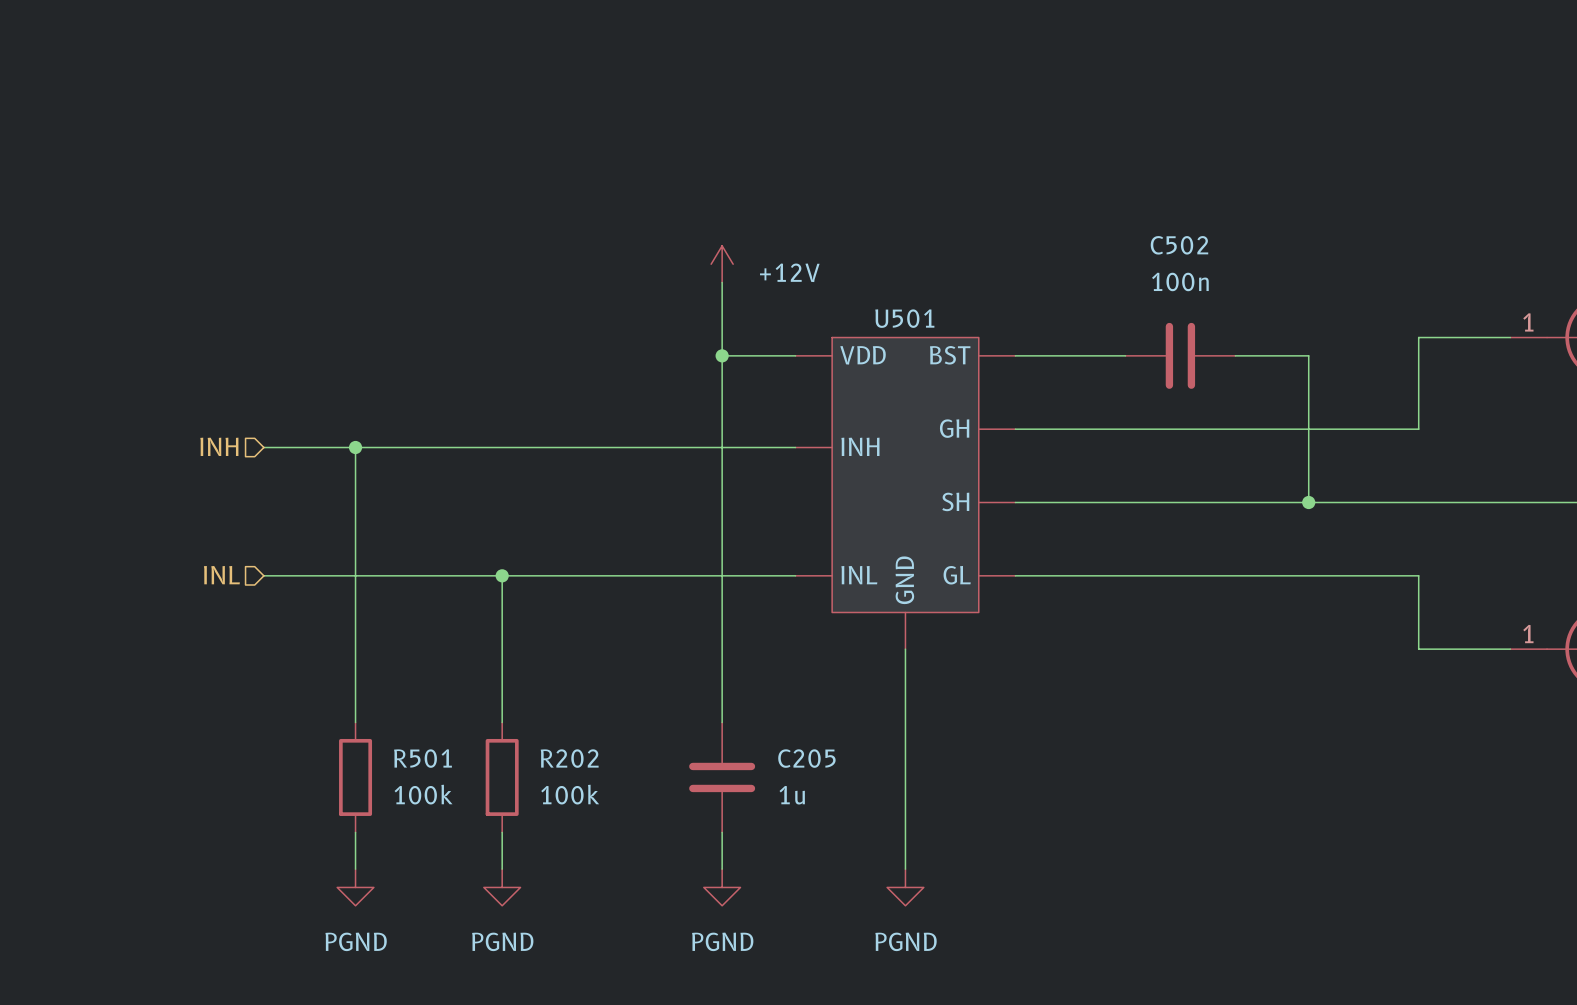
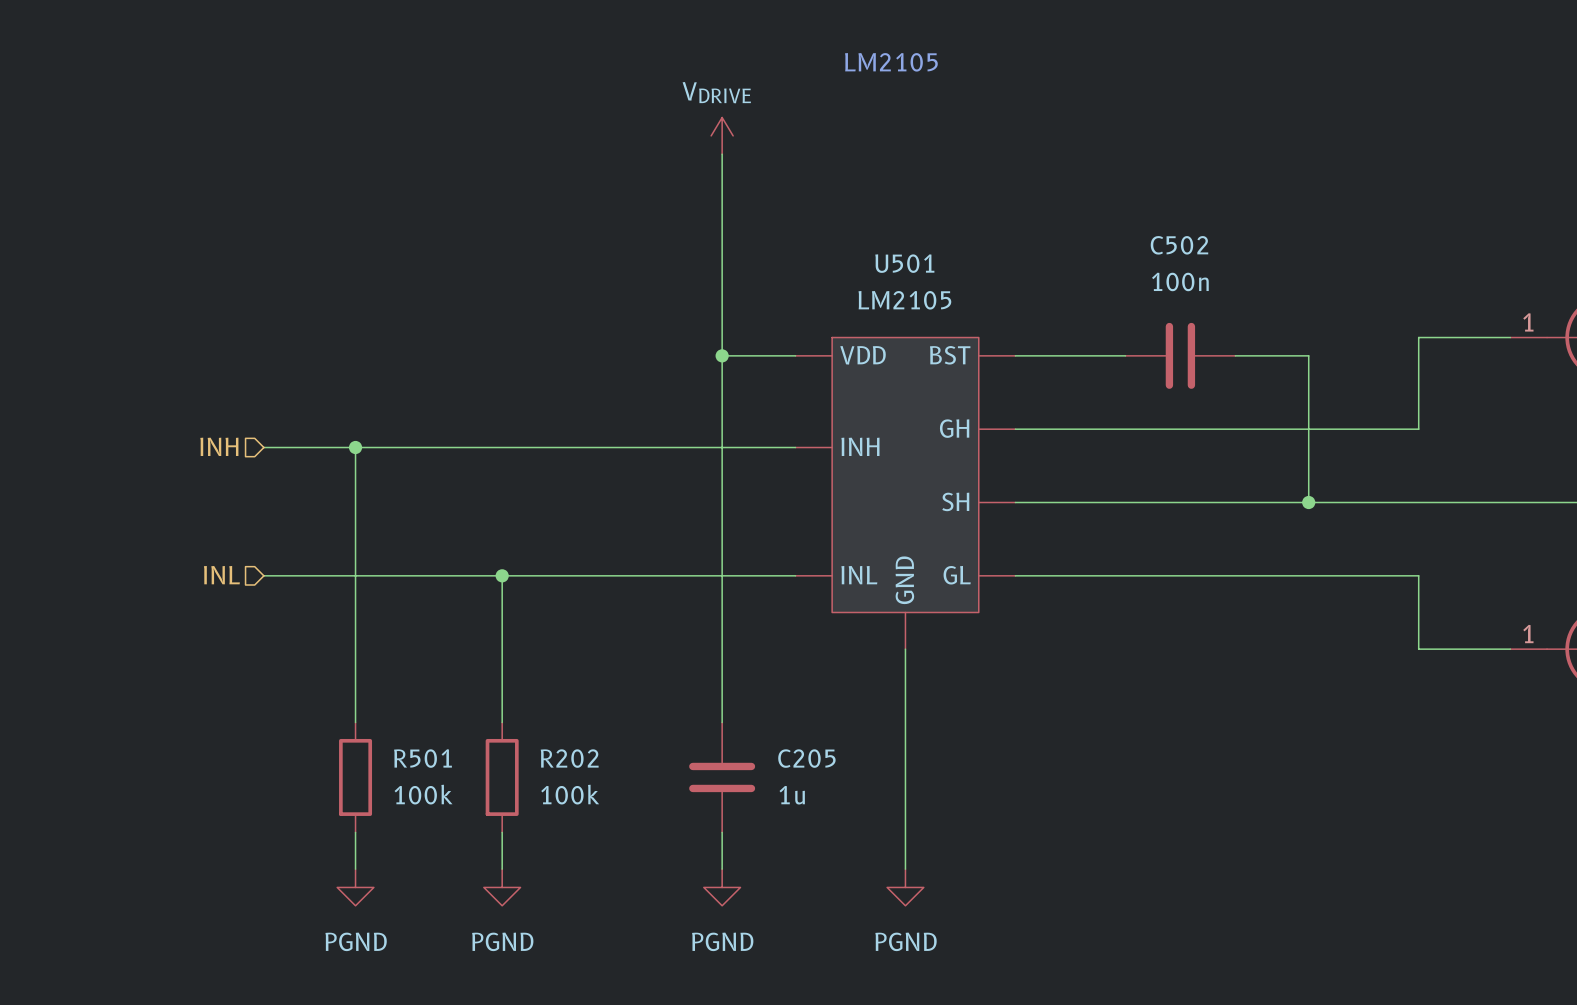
text: none -> LM2105 (891, 62)
power symbol: none -> VDRIVE (722, 135)
wire: none -> (722, 154) (722, 282)
power symbol: +12V (722, 264) -> none
U501 value: none -> LM2105 (904, 300)
U501 name position: U501 (904, 318) -> U501 (904, 263)

